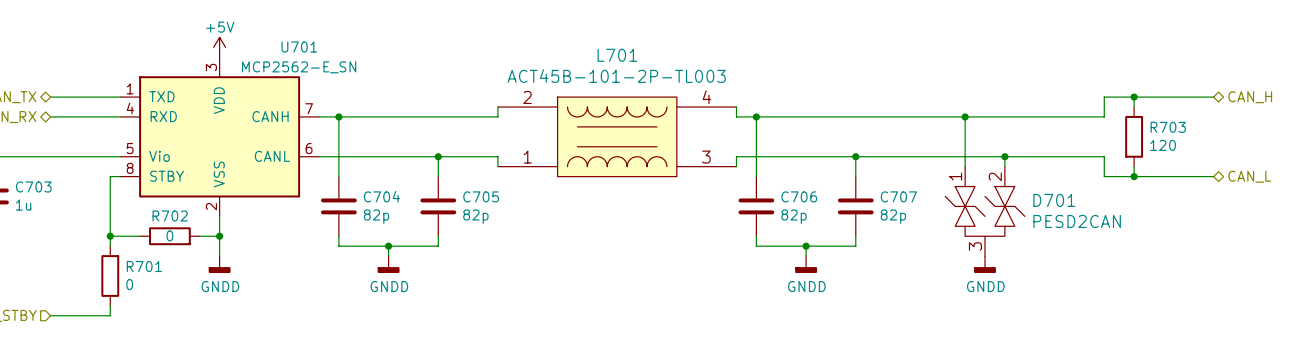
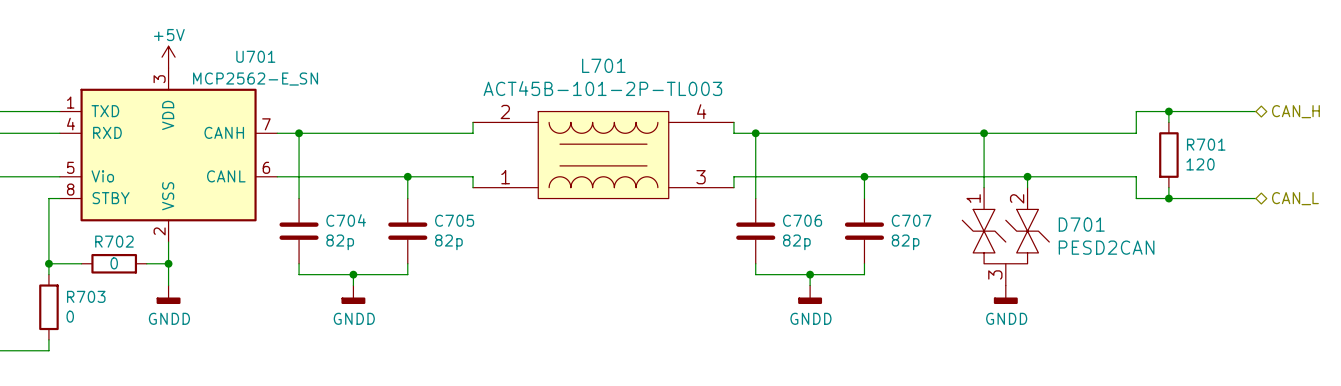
R703 name: R703 (1168, 127) -> R701 (1206, 144)
R701 name: R701 (144, 266) -> R703 (86, 296)

